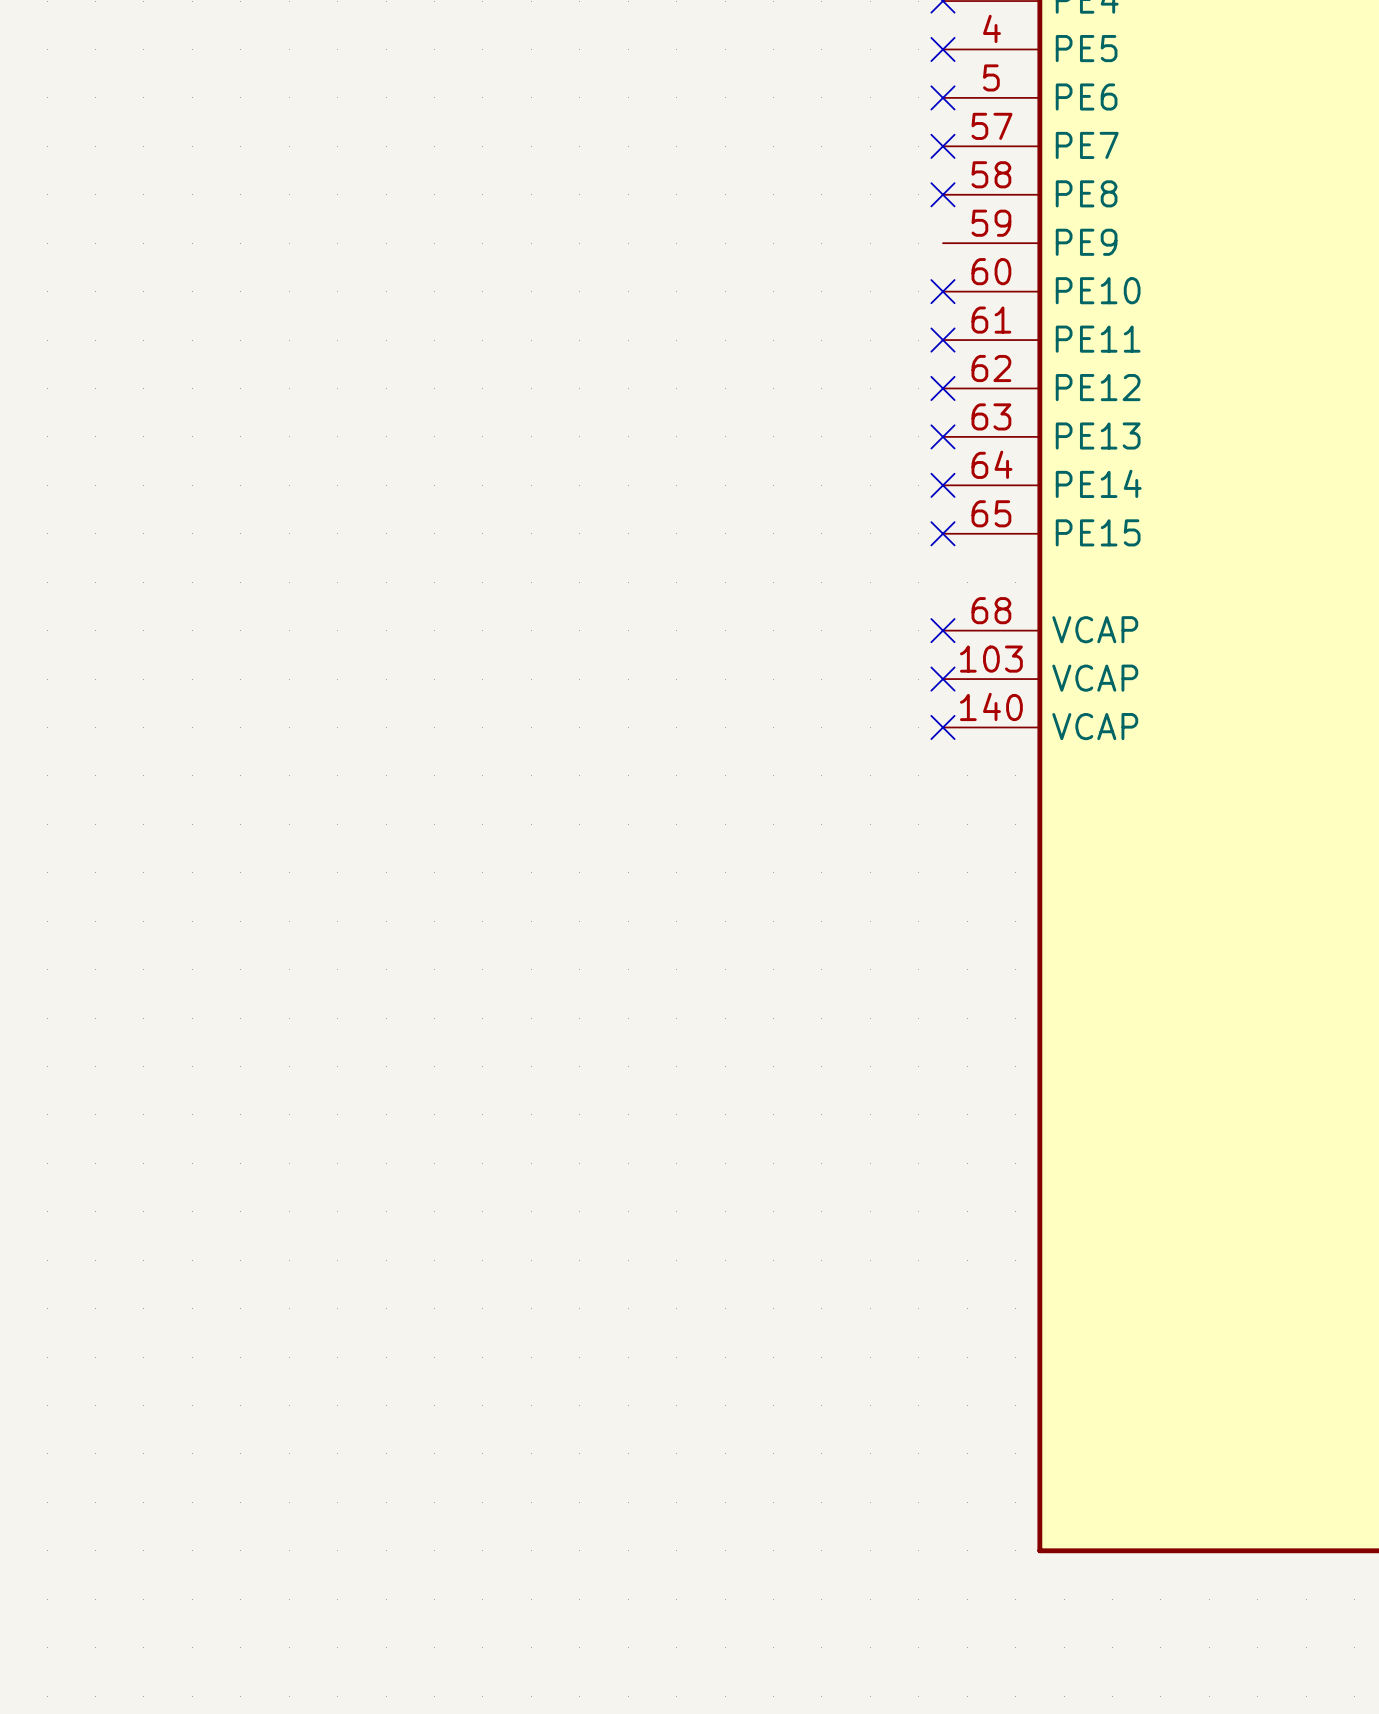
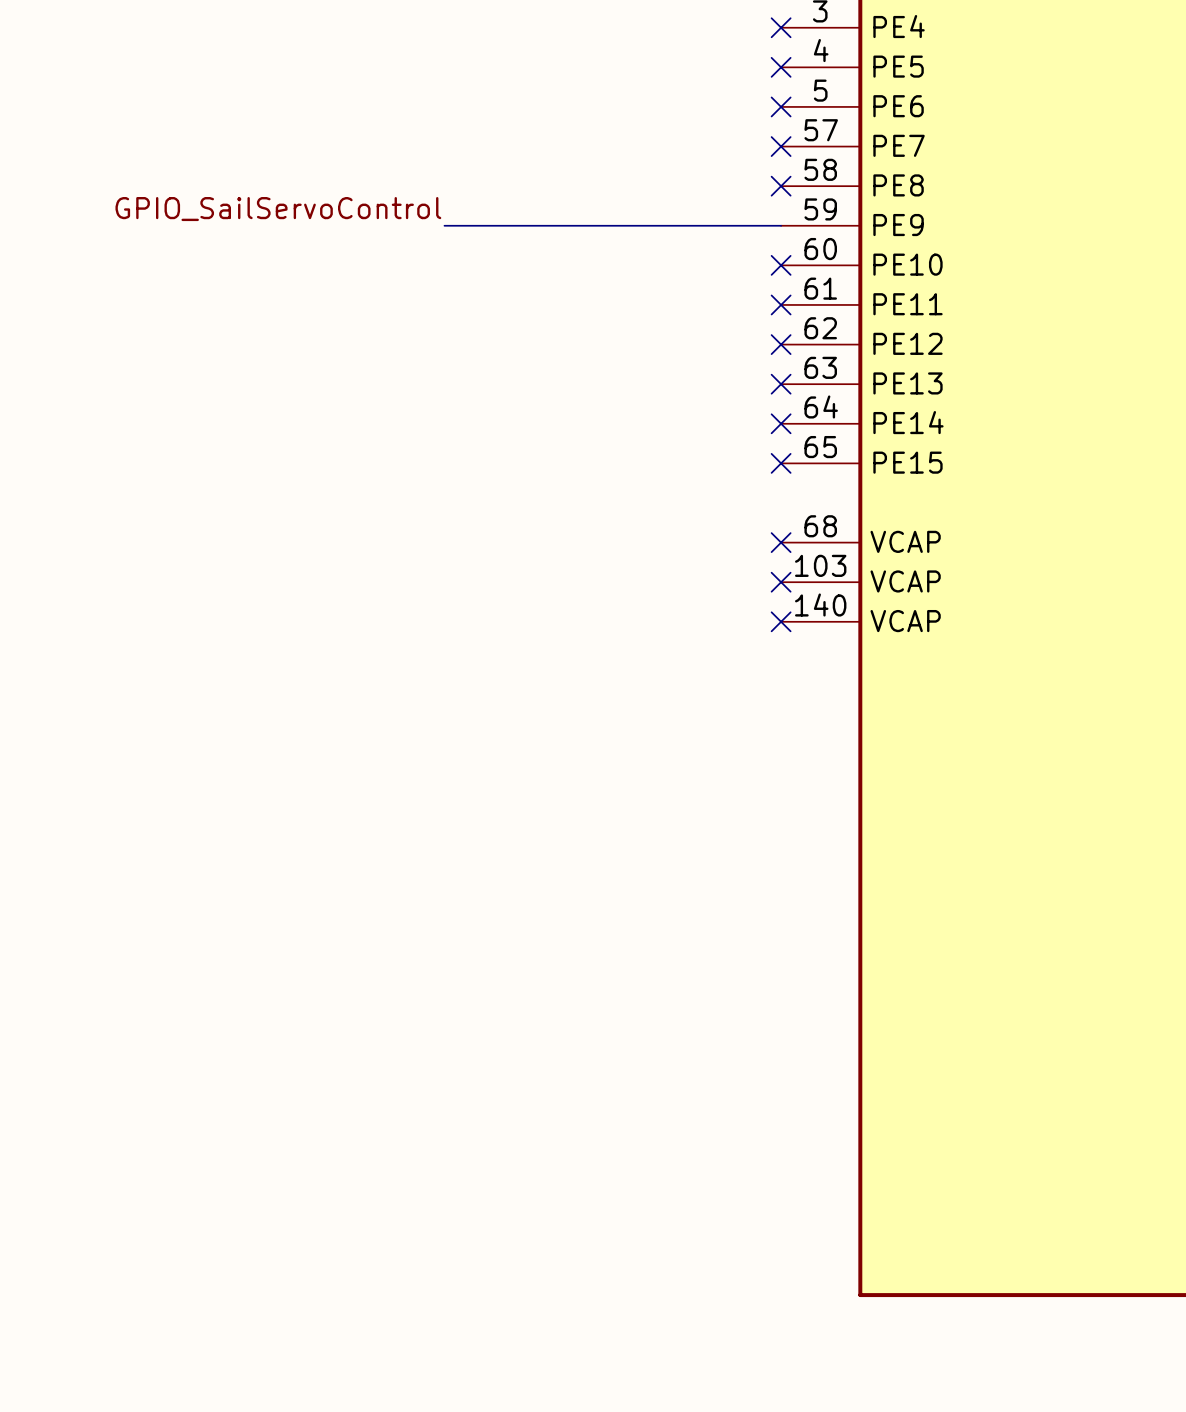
label: none -> GPIO_SailServoControl (278, 209)
wire: none -> (444, 225) (781, 225)

